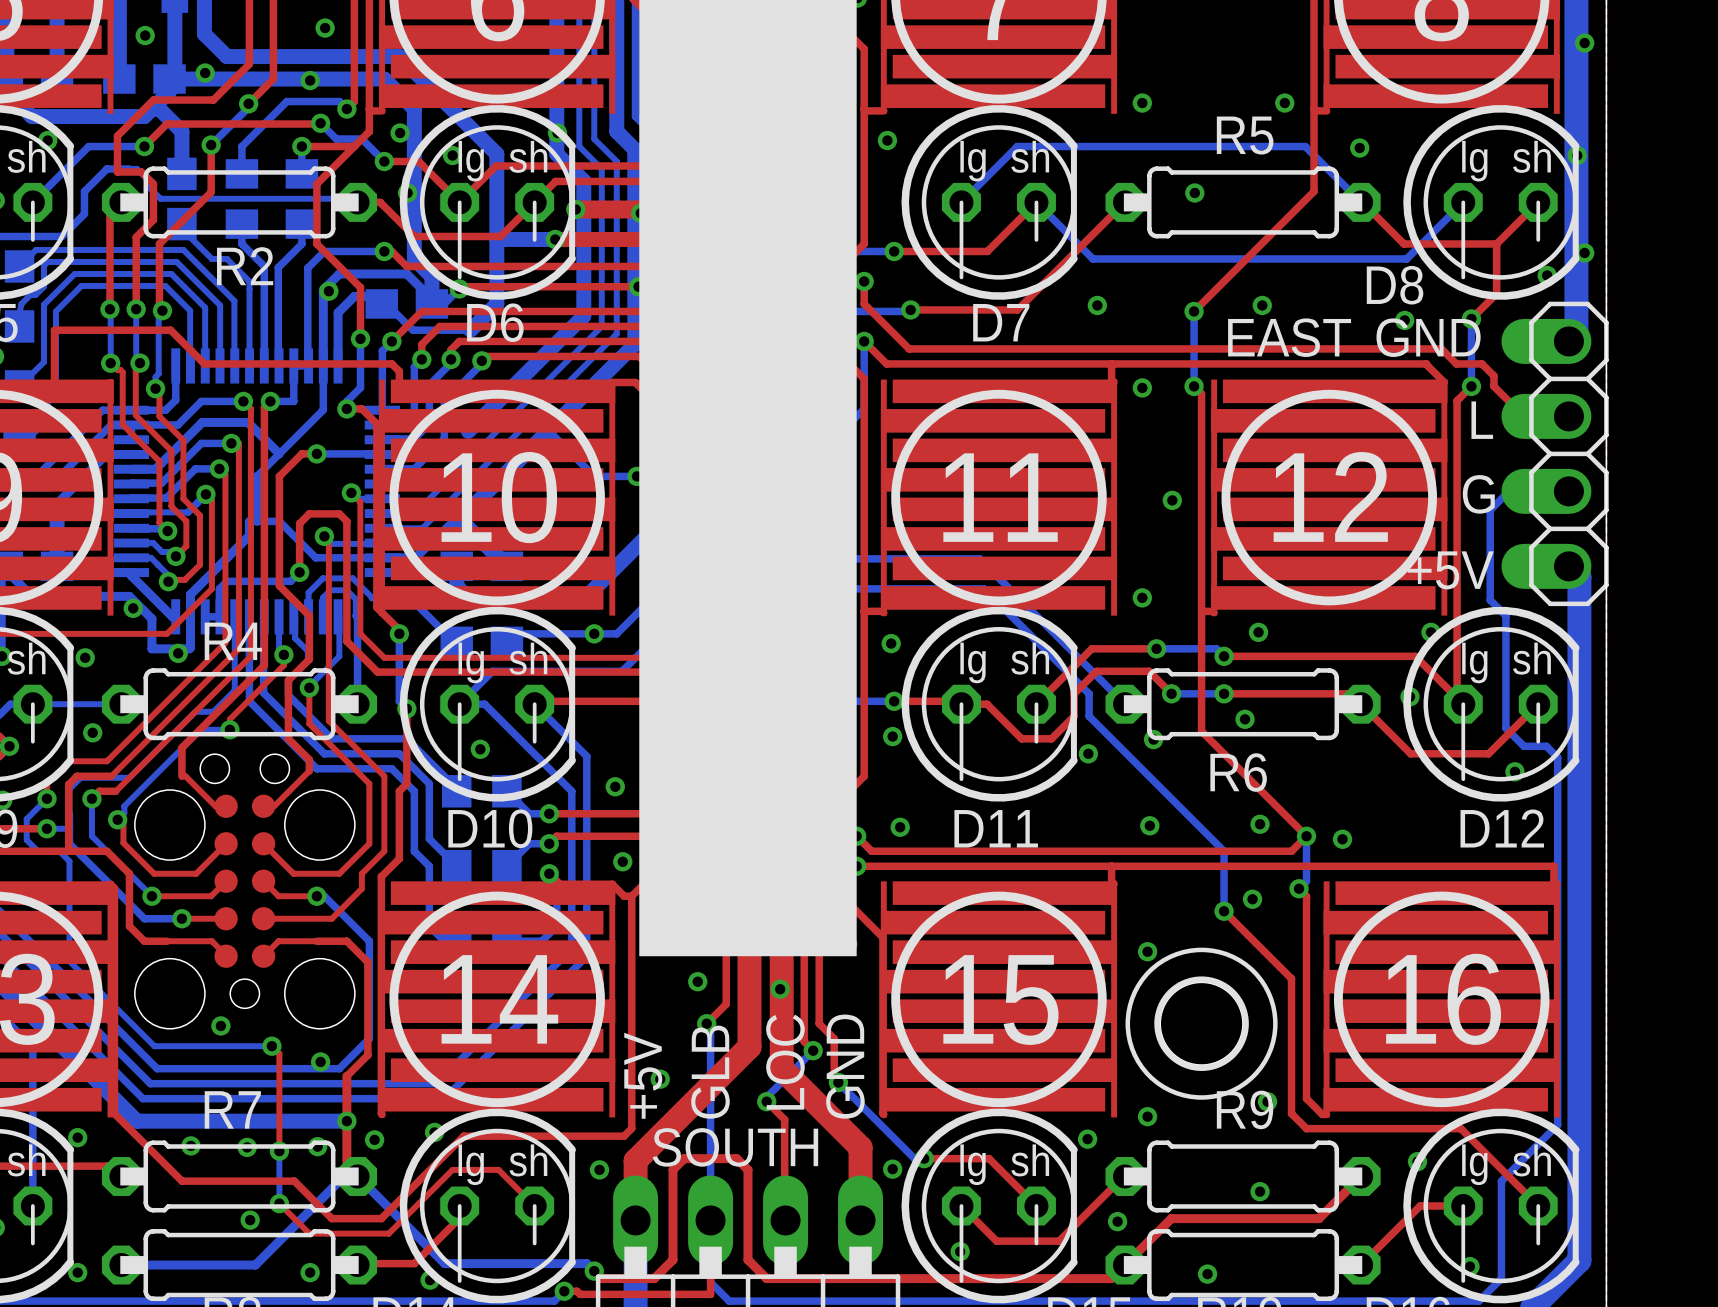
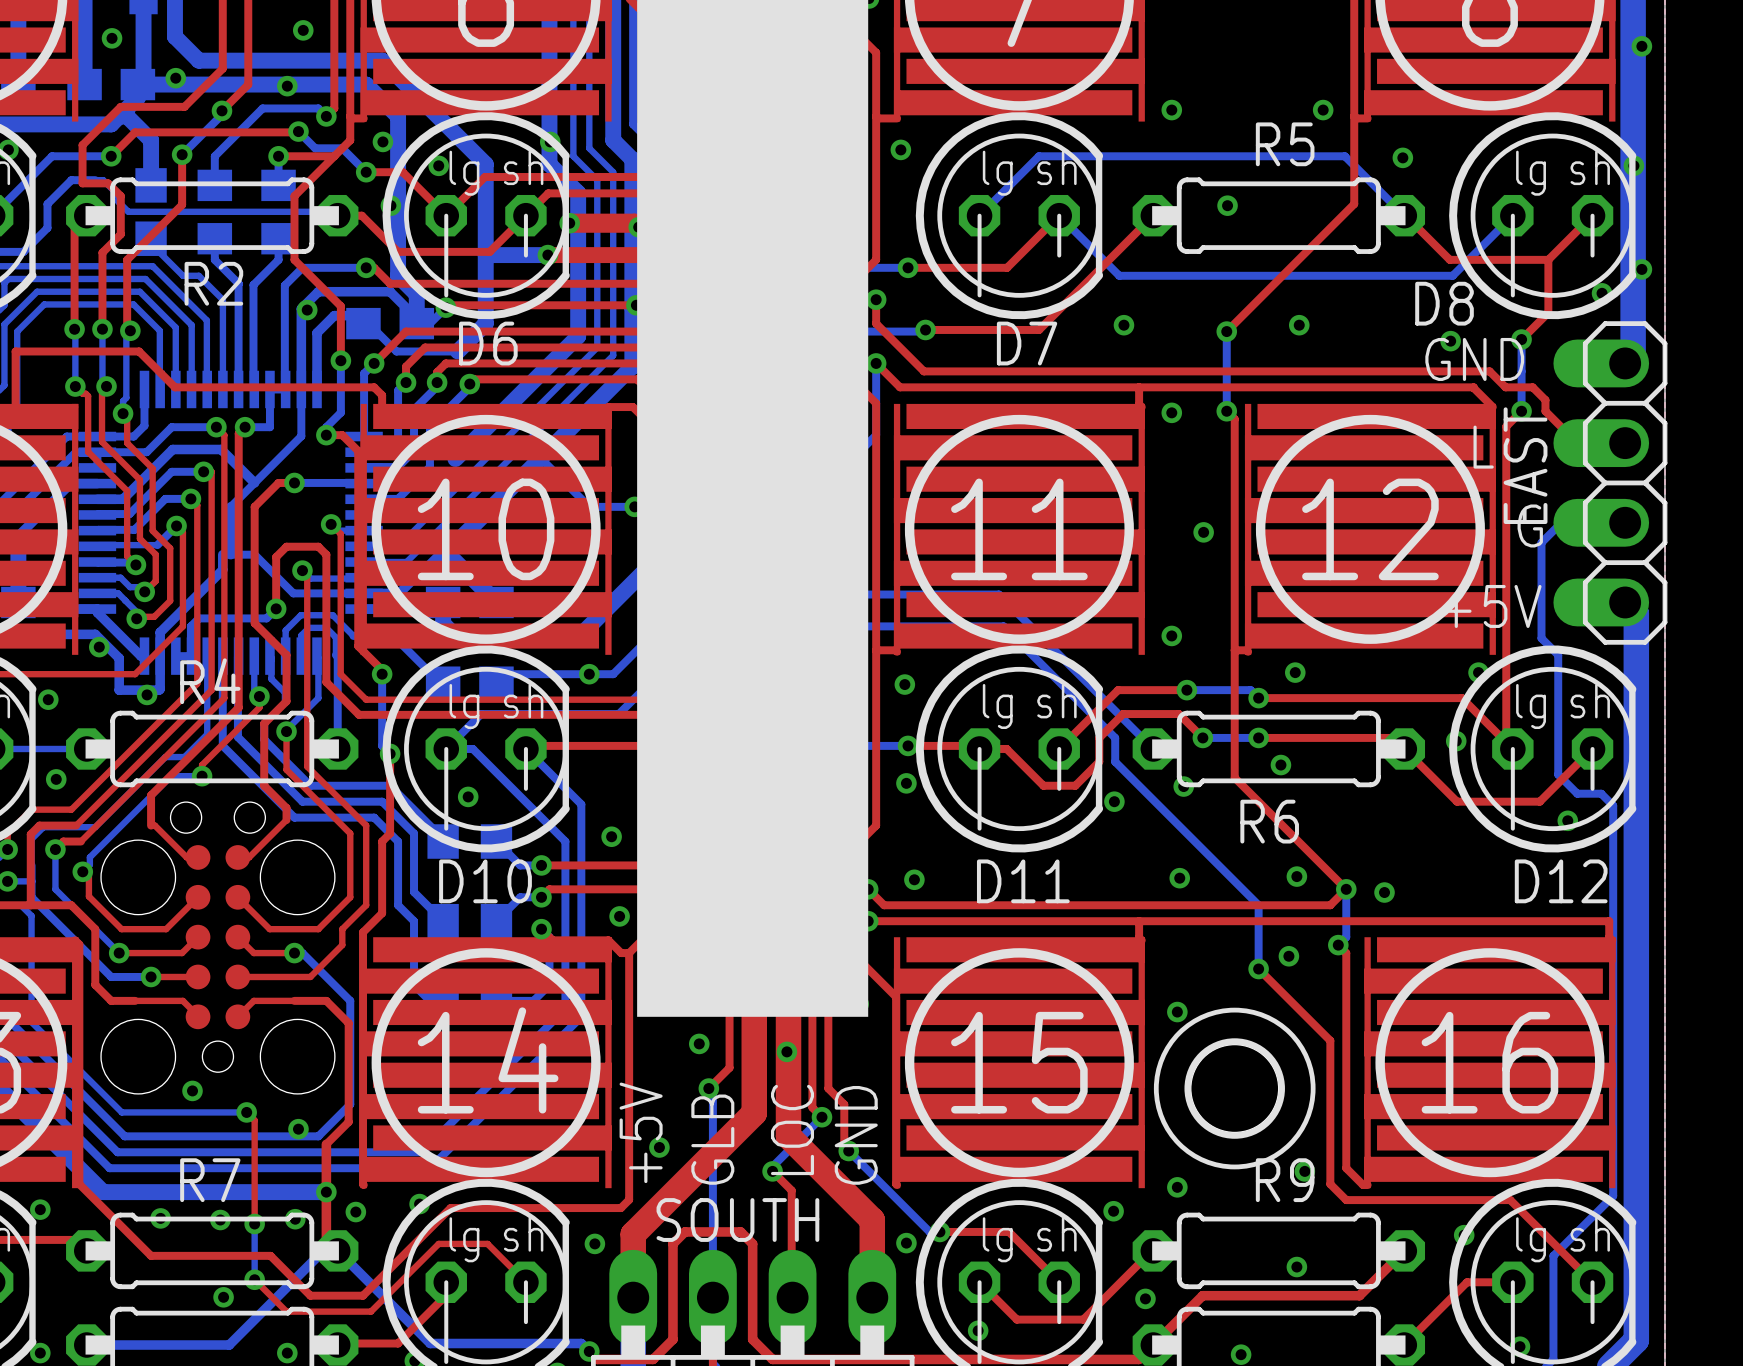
EAST name rotation: 0° (1289, 337) -> 90° counterclockwise (1525, 465)
EAST name position: EAST (1289, 337) -> EAST (1525, 465)
text position: L (1482, 420) -> L (1483, 447)

